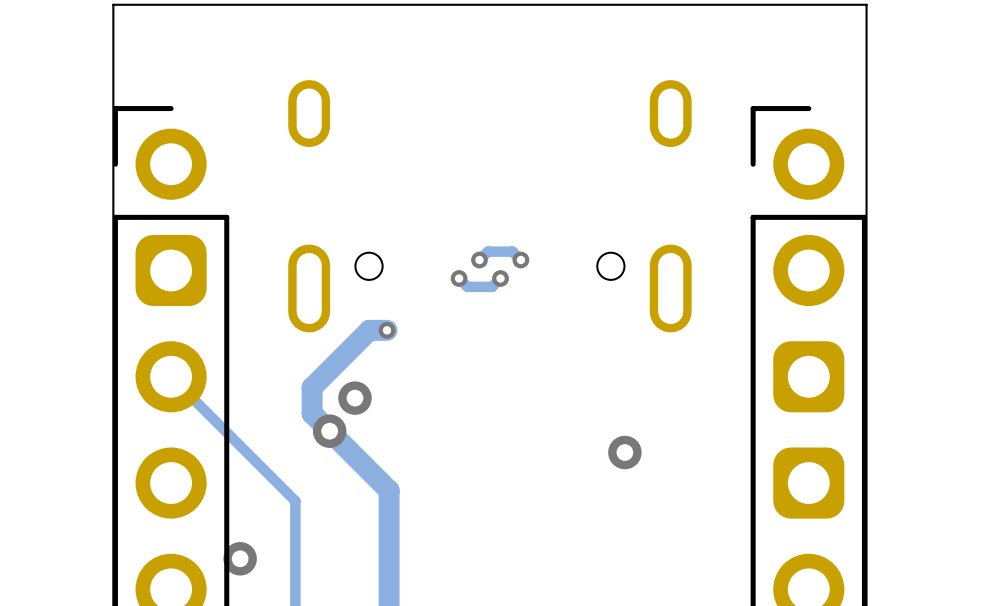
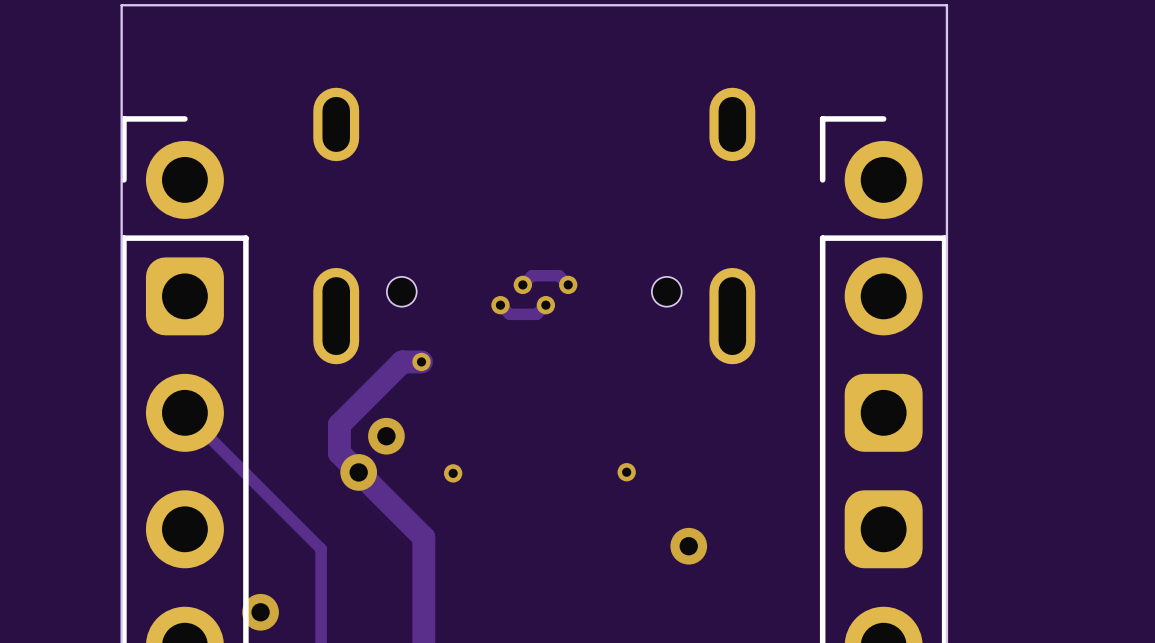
via: none -> (626, 472)
via: none -> (453, 473)
via position: (624, 452) -> (688, 546)

